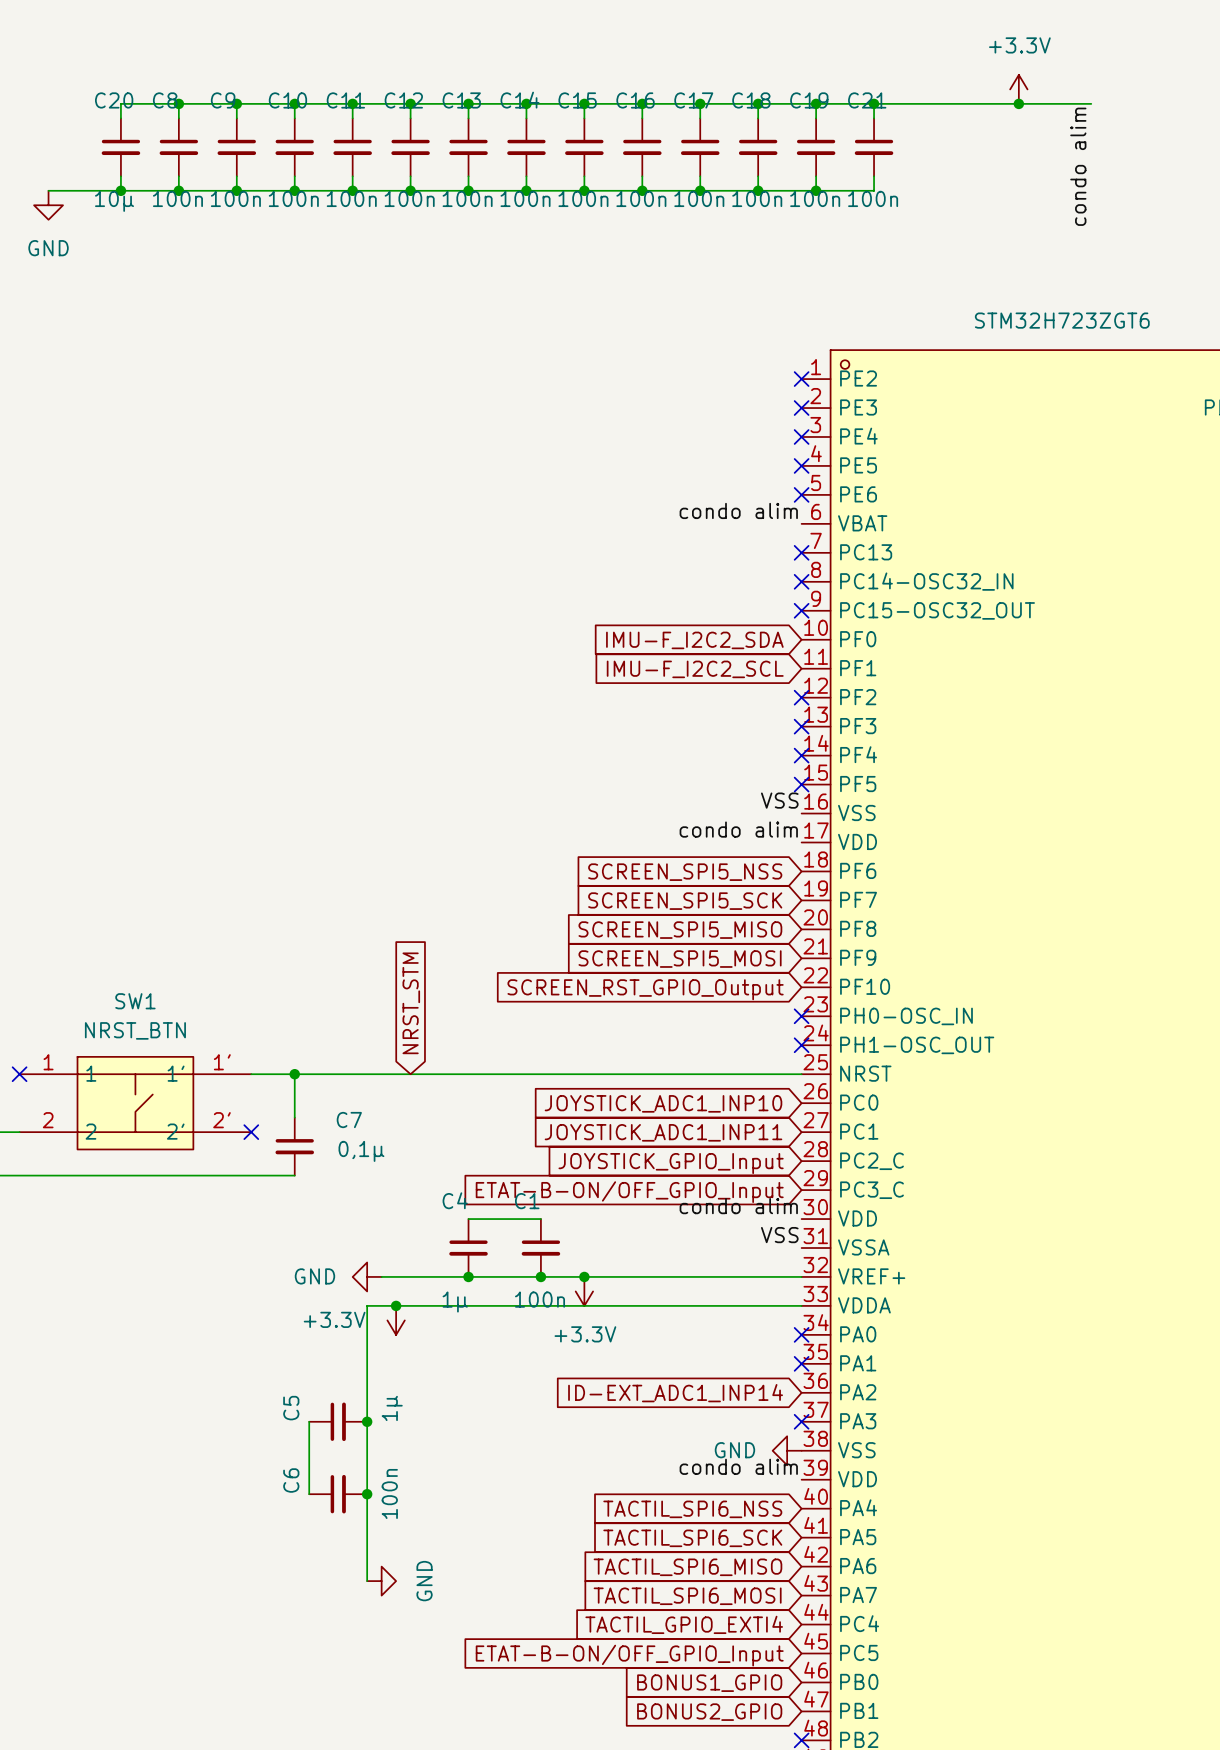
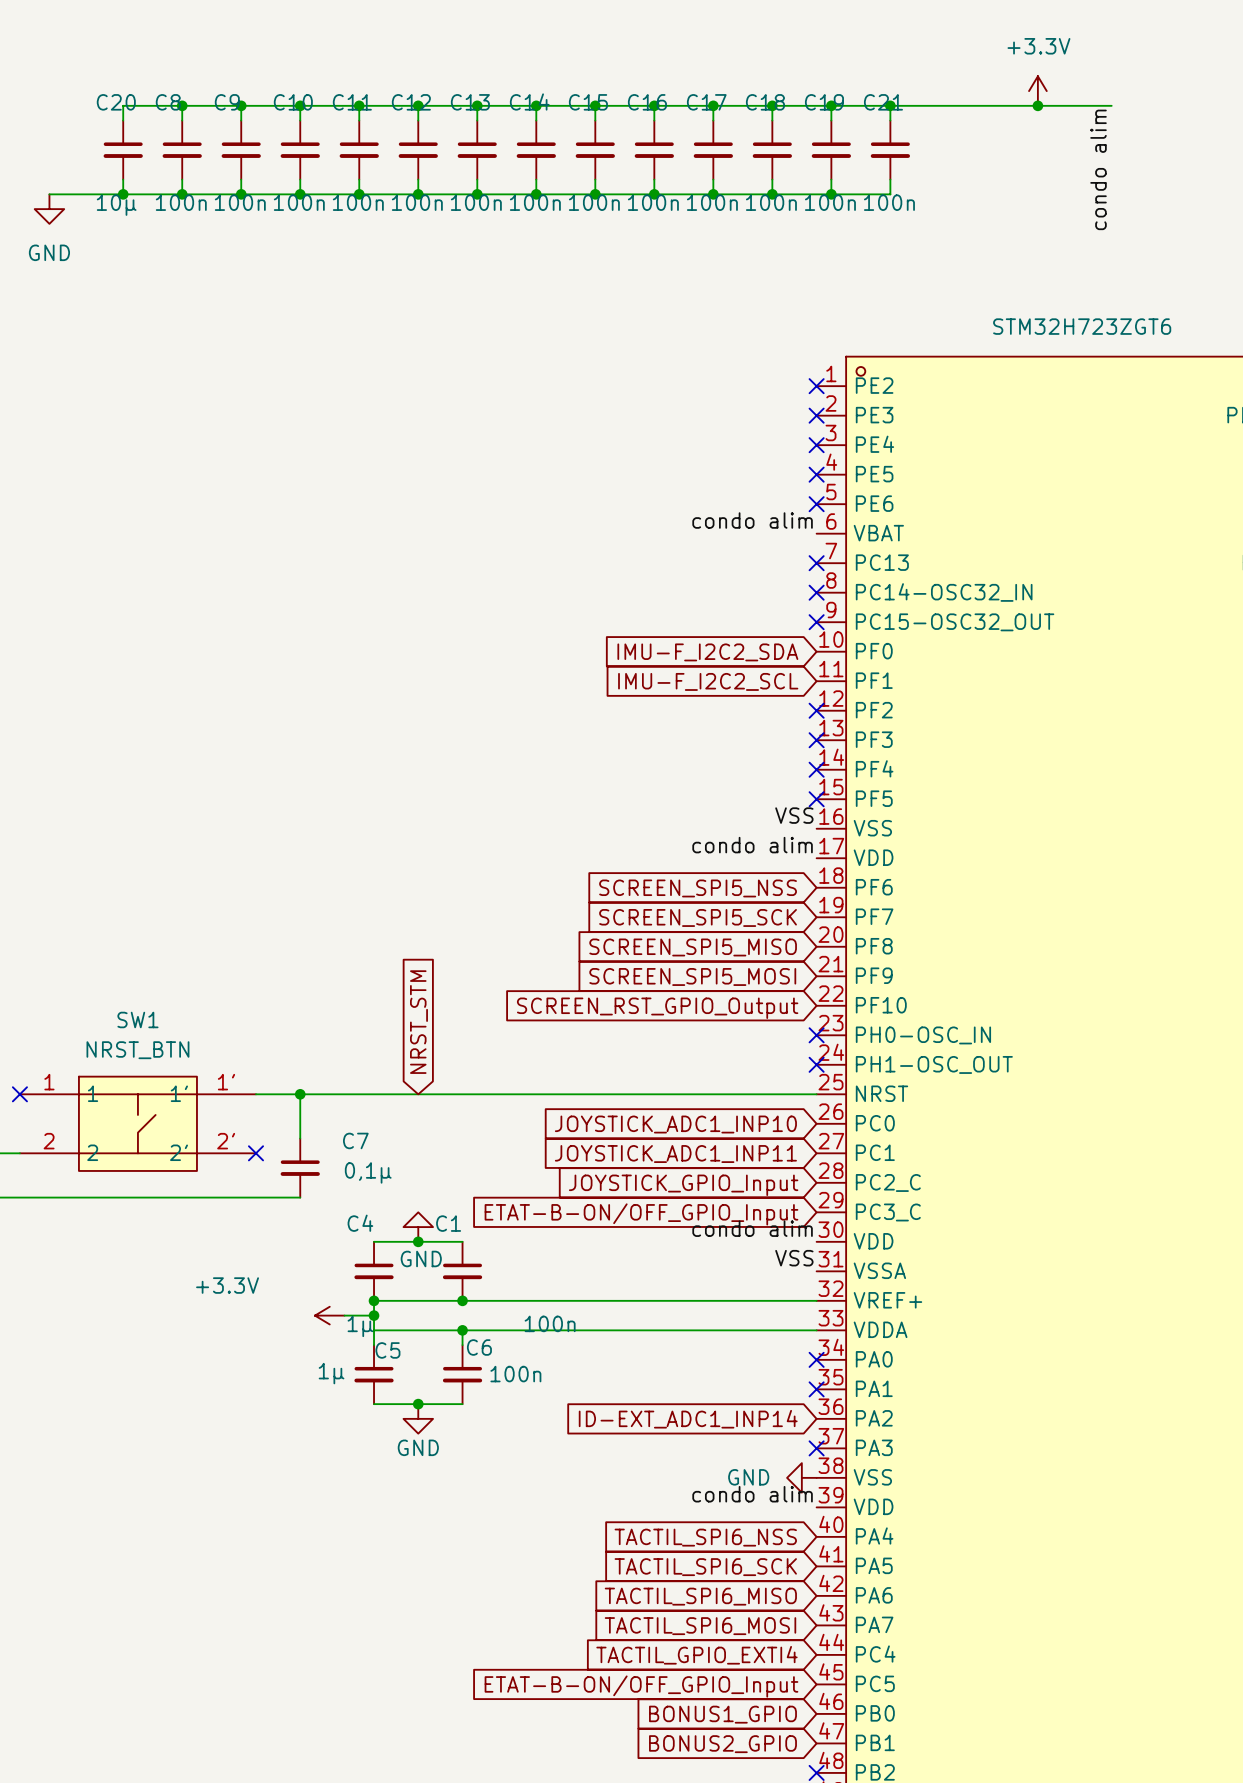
power symbol: none -> GND (418, 1227)
wire: none -> (374, 1241) (462, 1241)
junction: none -> (418, 1241)
wire: (468, 1219) (540, 1219) -> none
C4 position: (468, 1248) -> (374, 1271)
C1 position: (540, 1248) -> (462, 1271)
junction: none -> (374, 1300)
power symbol: GND (367, 1276) -> none
junction position: (468, 1276) -> (462, 1300)
junction: (540, 1276) -> none
junction: (584, 1276) -> none
wire: none -> (344, 1315) (374, 1315)
junction: none -> (374, 1315)
power symbol: +3.3V (584, 1291) -> none
junction: (396, 1305) -> none
wire: none -> (462, 1330) (462, 1345)
junction: none -> (462, 1330)
power symbol text position: +3.3V (334, 1319) -> +3.3V (227, 1285)
wire: (367, 1320) (367, 1581) -> none
power symbol rotation: 0° (396, 1320) -> 90° clockwise (329, 1315)
power symbol position: +3.3V (396, 1320) -> +3.3V (329, 1315)
wire: none -> (374, 1404) (462, 1404)
junction: none -> (418, 1404)
power symbol: none -> GND (418, 1418)
C5 name position: C5 (291, 1408) -> C5 (387, 1350)
C5 value position: 1µ (392, 1408) -> 1µ (331, 1373)
wire: (309, 1421) (309, 1494) -> none
C5 rotation: 0° (338, 1421) -> 90° clockwise (374, 1374)
C5 position: (338, 1421) -> (374, 1374)
junction: (367, 1421) -> none
C6 rotation: 0° (338, 1494) -> 90° clockwise (462, 1374)
C6 position: (338, 1494) -> (462, 1374)
junction: (367, 1494) -> none
power symbol: GND (381, 1581) -> none

